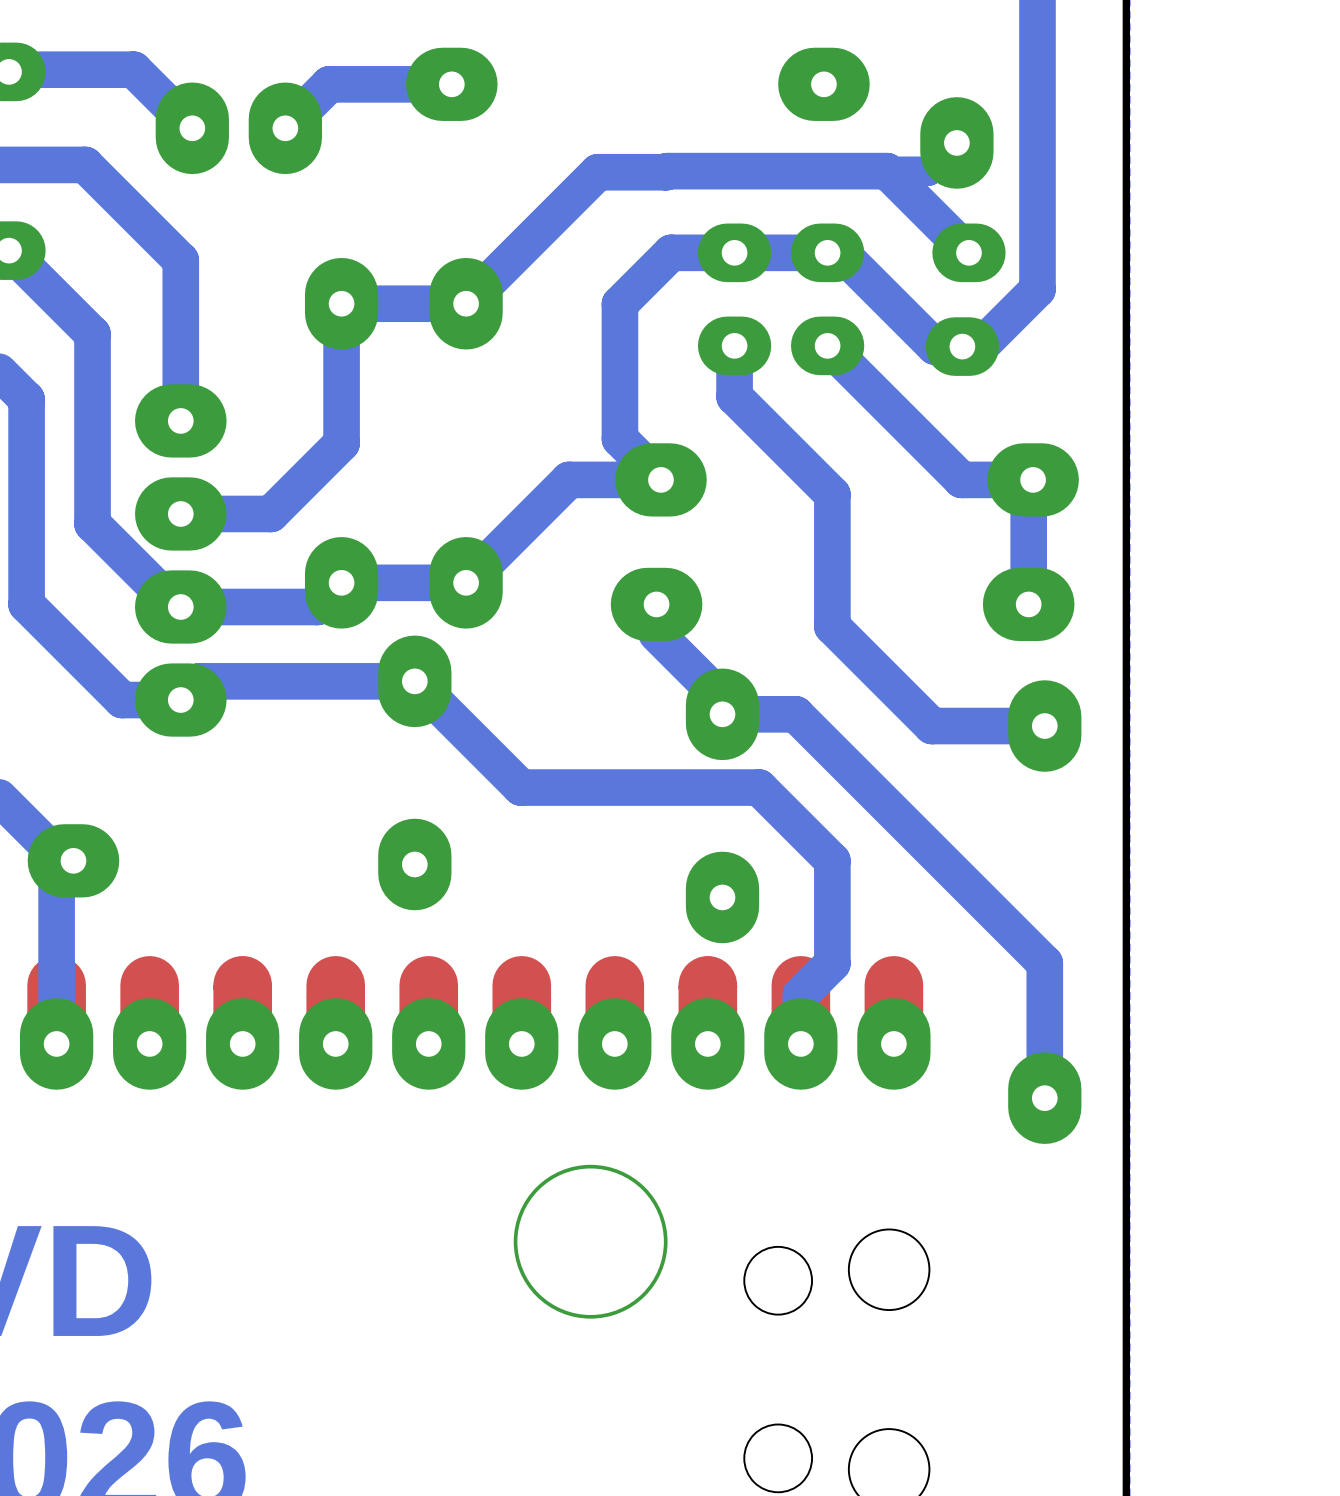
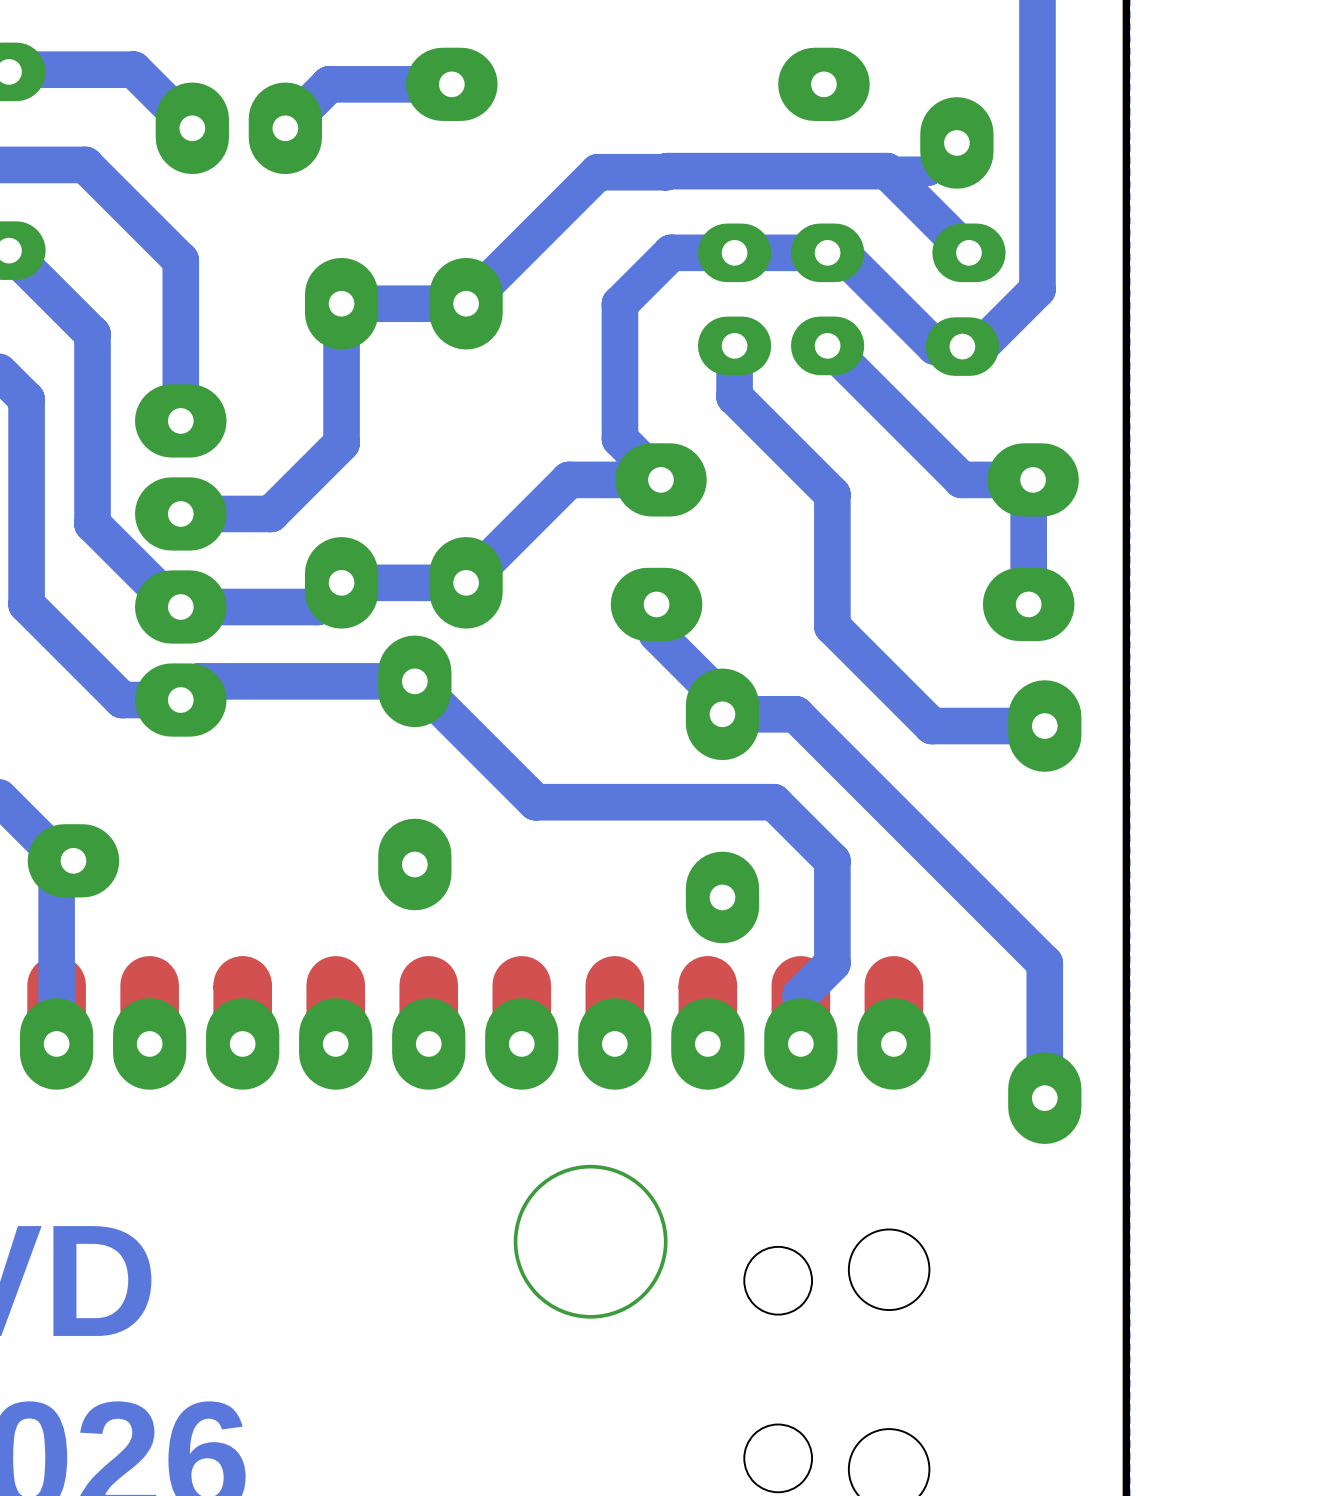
bottom track: (521, 787) (759, 787) (773, 802) -> (521, 787) (535, 802) (773, 802)

